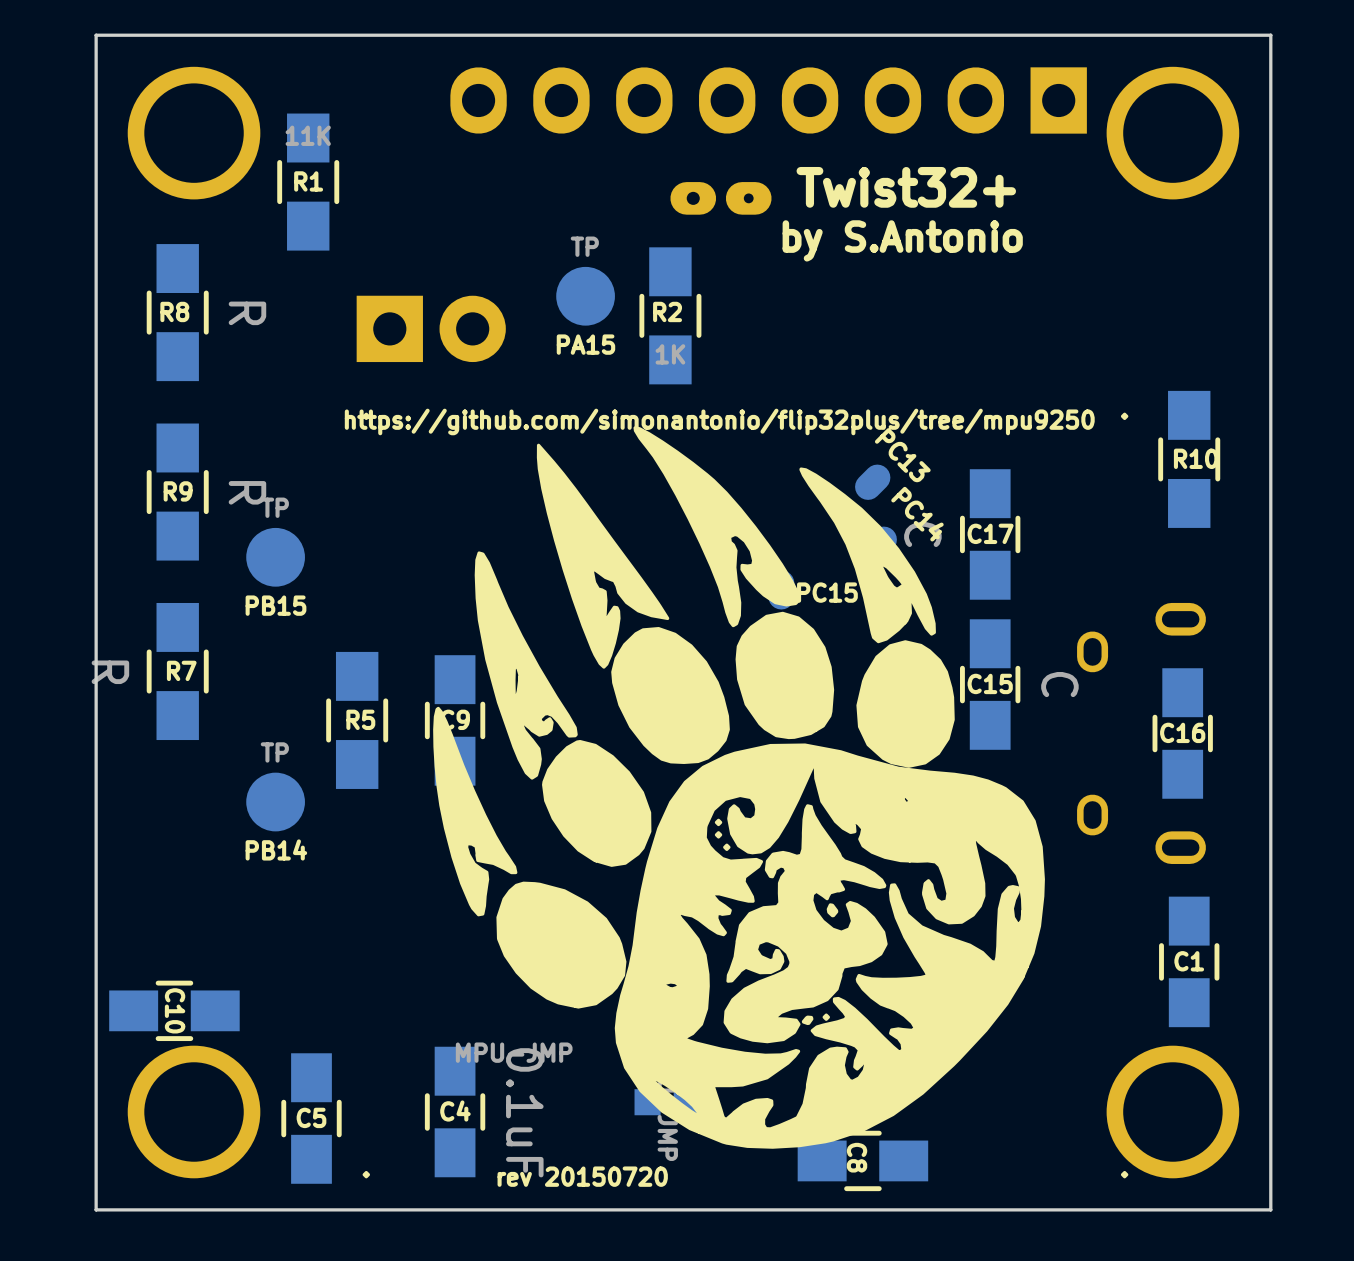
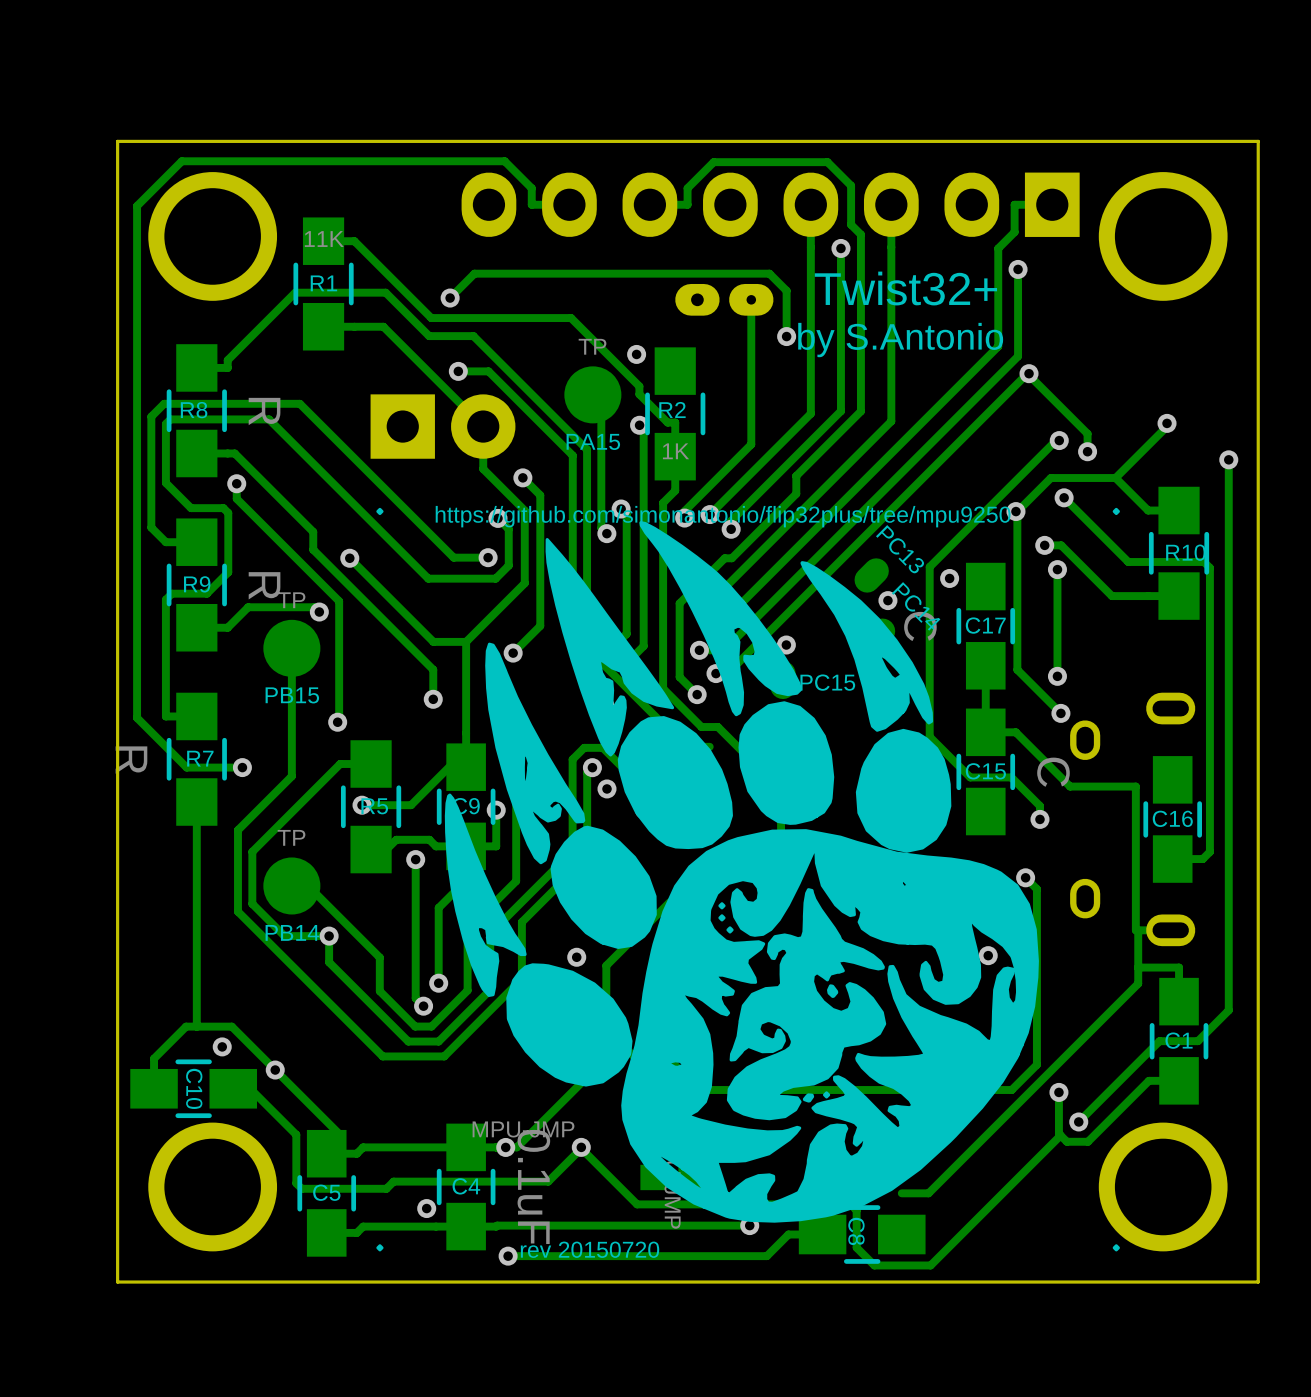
track: none -> (569, 204) (531, 204) (531, 188) (504, 161) (181, 161) (137, 206) (137, 717) (186, 767) (242, 767)
track: none -> (649, 204) (687, 204) (687, 188) (713, 162) (827, 162) (851, 185) (851, 224) (860, 234) (860, 411) (796, 475) (796, 493) (731, 558) (724, 558) (679, 603) (679, 677) (697, 694)
track: none -> (810, 204) (810, 413) (710, 514)
track: none -> (891, 204) (891, 421) (703, 609)
track: none -> (1052, 204) (1014, 204) (1014, 232) (998, 248) (998, 346) (737, 607)
track: none -> (323, 241) (354, 241) (431, 318) (571, 318) (639, 386) (639, 394) (667, 422) (675, 422) (675, 490) (663, 502) (663, 688) (701, 726) (717, 726) (781, 790) (781, 883)
track: none -> (840, 248) (840, 411) (731, 520) (731, 529)
via: none -> (840, 248)
track: none -> (1018, 269) (1018, 356) (724, 650) (699, 650)
via: none -> (1018, 269)
track: none -> (450, 298) (474, 273) (769, 273) (786, 290) (786, 336)
via: none -> (450, 298)
track: none -> (751, 299) (751, 444) (684, 511) (684, 518)
track: none -> (323, 326) (383, 326) (483, 426) (483, 469) (524, 510) (524, 583) (466, 641)
via: none -> (786, 336)
via: none -> (636, 354)
track: none -> (196, 367) (227, 367) (227, 360) (295, 292) (385, 292) (429, 336) (473, 336) (587, 449) (587, 627) (617, 658) (631, 658) (643, 646) (643, 429) (639, 425)
track: none -> (458, 371) (488, 371) (572, 455) (572, 633) (685, 746) (709, 746)
via: none -> (458, 371)
track: none -> (1027, 373) (1087, 433) (1087, 451)
track: none -> (1027, 373) (727, 673) (716, 673)
via: none -> (1029, 373)
track: none -> (592, 394) (601, 403) (601, 528) (606, 533)
track: none -> (1167, 423) (1167, 426) (1115, 478)
via: none -> (1167, 423)
via: none -> (639, 425)
track: none -> (1059, 440) (1056, 440) (929, 566) (929, 736) (970, 777) (1011, 777) (1039, 806) (1039, 819)
via: none -> (1059, 440)
via: none -> (1087, 451)
track: none -> (196, 453) (234, 453) (313, 531) (313, 549) (433, 669) (433, 699)
track: none -> (1228, 459) (1228, 1010) (1197, 1041) (1159, 1041) (1078, 1121)
via: none -> (1228, 459)
track: none -> (522, 477) (540, 495) (540, 625) (513, 653)
via: none -> (522, 477)
track: none -> (1115, 478) (1148, 510) (1179, 510)
track: none -> (1115, 478) (1050, 478) (1017, 511)
track: none -> (236, 483) (236, 498) (339, 601) (337, 722)
via: none -> (236, 483)
track: none -> (1064, 497) (1128, 561) (1204, 561) (1209, 567) (1209, 851) (1202, 859) (1172, 859)
via: none -> (1064, 497)
track: none -> (621, 509) (626, 514) (626, 633) (623, 636)
via: none -> (621, 509)
via: none -> (1015, 511)
track: none -> (1017, 511) (1017, 669) (1060, 713)
via: none -> (710, 514)
track: none -> (497, 518) (508, 529) (508, 565) (495, 578) (428, 578) (269, 419) (170, 419) (165, 423) (165, 482) (191, 508) (223, 508) (228, 512) (228, 572) (206, 593) (171, 593) (165, 599) (165, 716) (196, 716)
via: none -> (497, 518)
via: none -> (684, 518)
via: none -> (731, 529)
via: none -> (606, 533)
track: none -> (196, 542) (165, 542) (151, 527) (151, 416) (164, 403) (299, 403) (453, 557) (488, 557)
track: none -> (1044, 545) (1061, 545) (1111, 596) (1179, 596)
via: none -> (1044, 545)
via: none -> (488, 557)
track: none -> (349, 558) (433, 641) (466, 641)
via: none -> (349, 558)
track: none -> (1057, 569) (1057, 676)
via: none -> (1057, 569)
via: none -> (949, 578)
via: none -> (887, 600)
track: none -> (319, 612) (314, 607) (248, 607) (227, 627) (196, 627)
via: none -> (319, 612)
track: none -> (466, 641) (466, 767)
via: none -> (786, 645)
track: none -> (291, 648) (291, 776) (237, 830) (237, 911) (382, 1056) (444, 1056) (521, 978) (521, 922) (587, 856) (587, 772) (592, 767)
via: none -> (699, 650)
via: none -> (513, 653)
track: none -> (985, 665) (985, 732) (1015, 732) (1070, 786) (1135, 786) (1135, 930) (1170, 930)
via: none -> (716, 673)
via: none -> (1057, 676)
via: none -> (697, 694)
via: none -> (433, 699)
via: none -> (1060, 713)
via: none -> (337, 722)
track: none -> (466, 750) (411, 805) (362, 805)
track: none -> (371, 764) (340, 764) (252, 851) (252, 903) (284, 936) (329, 936) (329, 962) (408, 1041) (438, 1041) (490, 990) (490, 933) (572, 851) (572, 759) (584, 747) (602, 747) (644, 789) (644, 809)
via: none -> (242, 767)
via: none -> (592, 767)
track: none -> (509, 770) (516, 777) (516, 881) (467, 929) (467, 990) (431, 1026) (415, 1026) (379, 991) (379, 957) (308, 885) (291, 885)
via: none -> (607, 788)
track: none -> (196, 802) (196, 1026)
via: none -> (362, 805)
track: none -> (496, 810) (496, 846) (436, 846) (429, 839) (396, 839) (386, 849) (371, 849)
via: none -> (496, 810)
via: none -> (1039, 819)
track: none -> (466, 846) (466, 880) (438, 907) (438, 983)
track: none -> (415, 859) (415, 998) (423, 1006)
via: none -> (415, 859)
track: none -> (1025, 877) (1036, 889) (1036, 1064) (1011, 1090) (699, 1090) (672, 1062) (640, 1062) (606, 1028) (606, 965) (669, 902)
via: none -> (1025, 877)
track: none -> (1138, 930) (1138, 983) (928, 1193) (901, 1193)
via: none -> (329, 936)
via: none -> (988, 955)
via: none -> (576, 957)
track: none -> (1138, 967) (1179, 967) (1179, 1001)
via: none -> (438, 983)
via: none -> (423, 1006)
via: none -> (222, 1046)
via: none -> (275, 1070)
track: none -> (591, 1073) (516, 1147) (363, 1147) (356, 1153) (326, 1153)
track: none -> (1179, 1080) (1148, 1080) (1087, 1141) (1066, 1141) (1058, 1133) (1058, 1092)
track: none -> (154, 1088) (154, 1058) (186, 1026) (231, 1026) (341, 1136) (341, 1153)
track: none -> (233, 1088) (250, 1088) (296, 1134) (296, 1183) (301, 1188) (386, 1188) (393, 1181) (548, 1181) (581, 1148)
via: none -> (1058, 1092)
via: none -> (1078, 1121)
track: none -> (1060, 1135) (930, 1265) (874, 1265) (856, 1247) (856, 1210) (850, 1204) (637, 1204) (581, 1148)
via: none -> (505, 1147)
via: none -> (581, 1147)
via: none -> (426, 1208)
track: none -> (749, 1225) (363, 1226) (356, 1232) (326, 1232)
via: none -> (749, 1225)
track: none -> (822, 1234) (788, 1234) (766, 1256) (508, 1256)
via: none -> (508, 1256)

